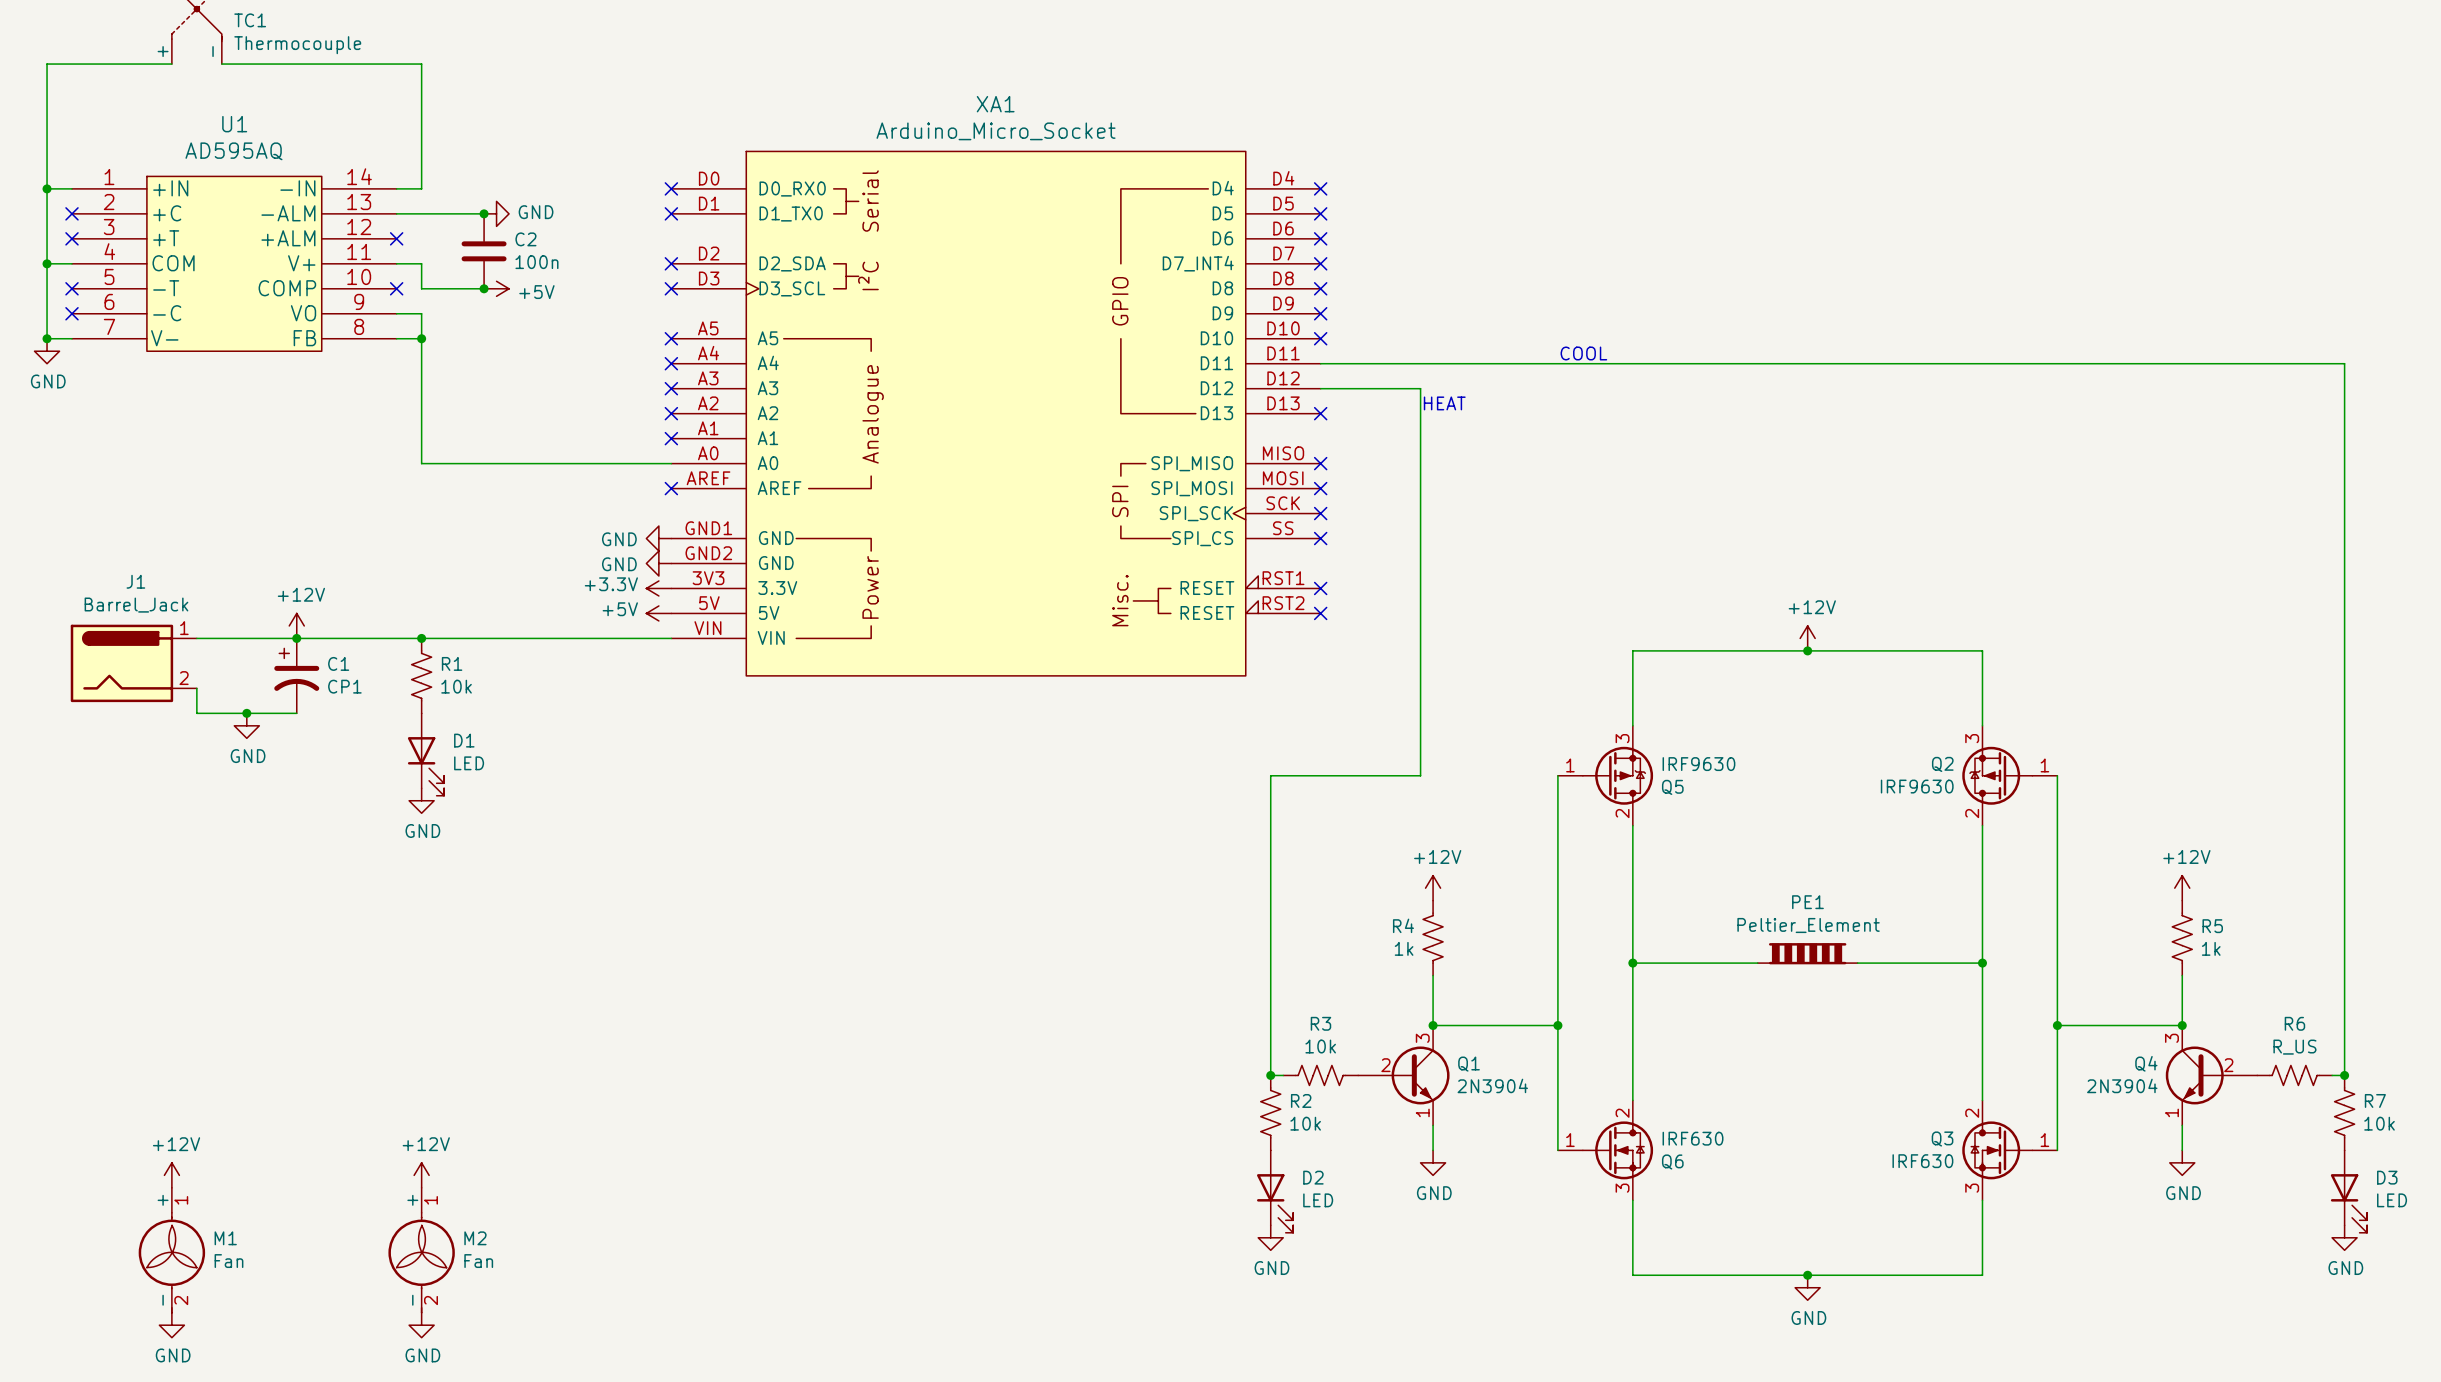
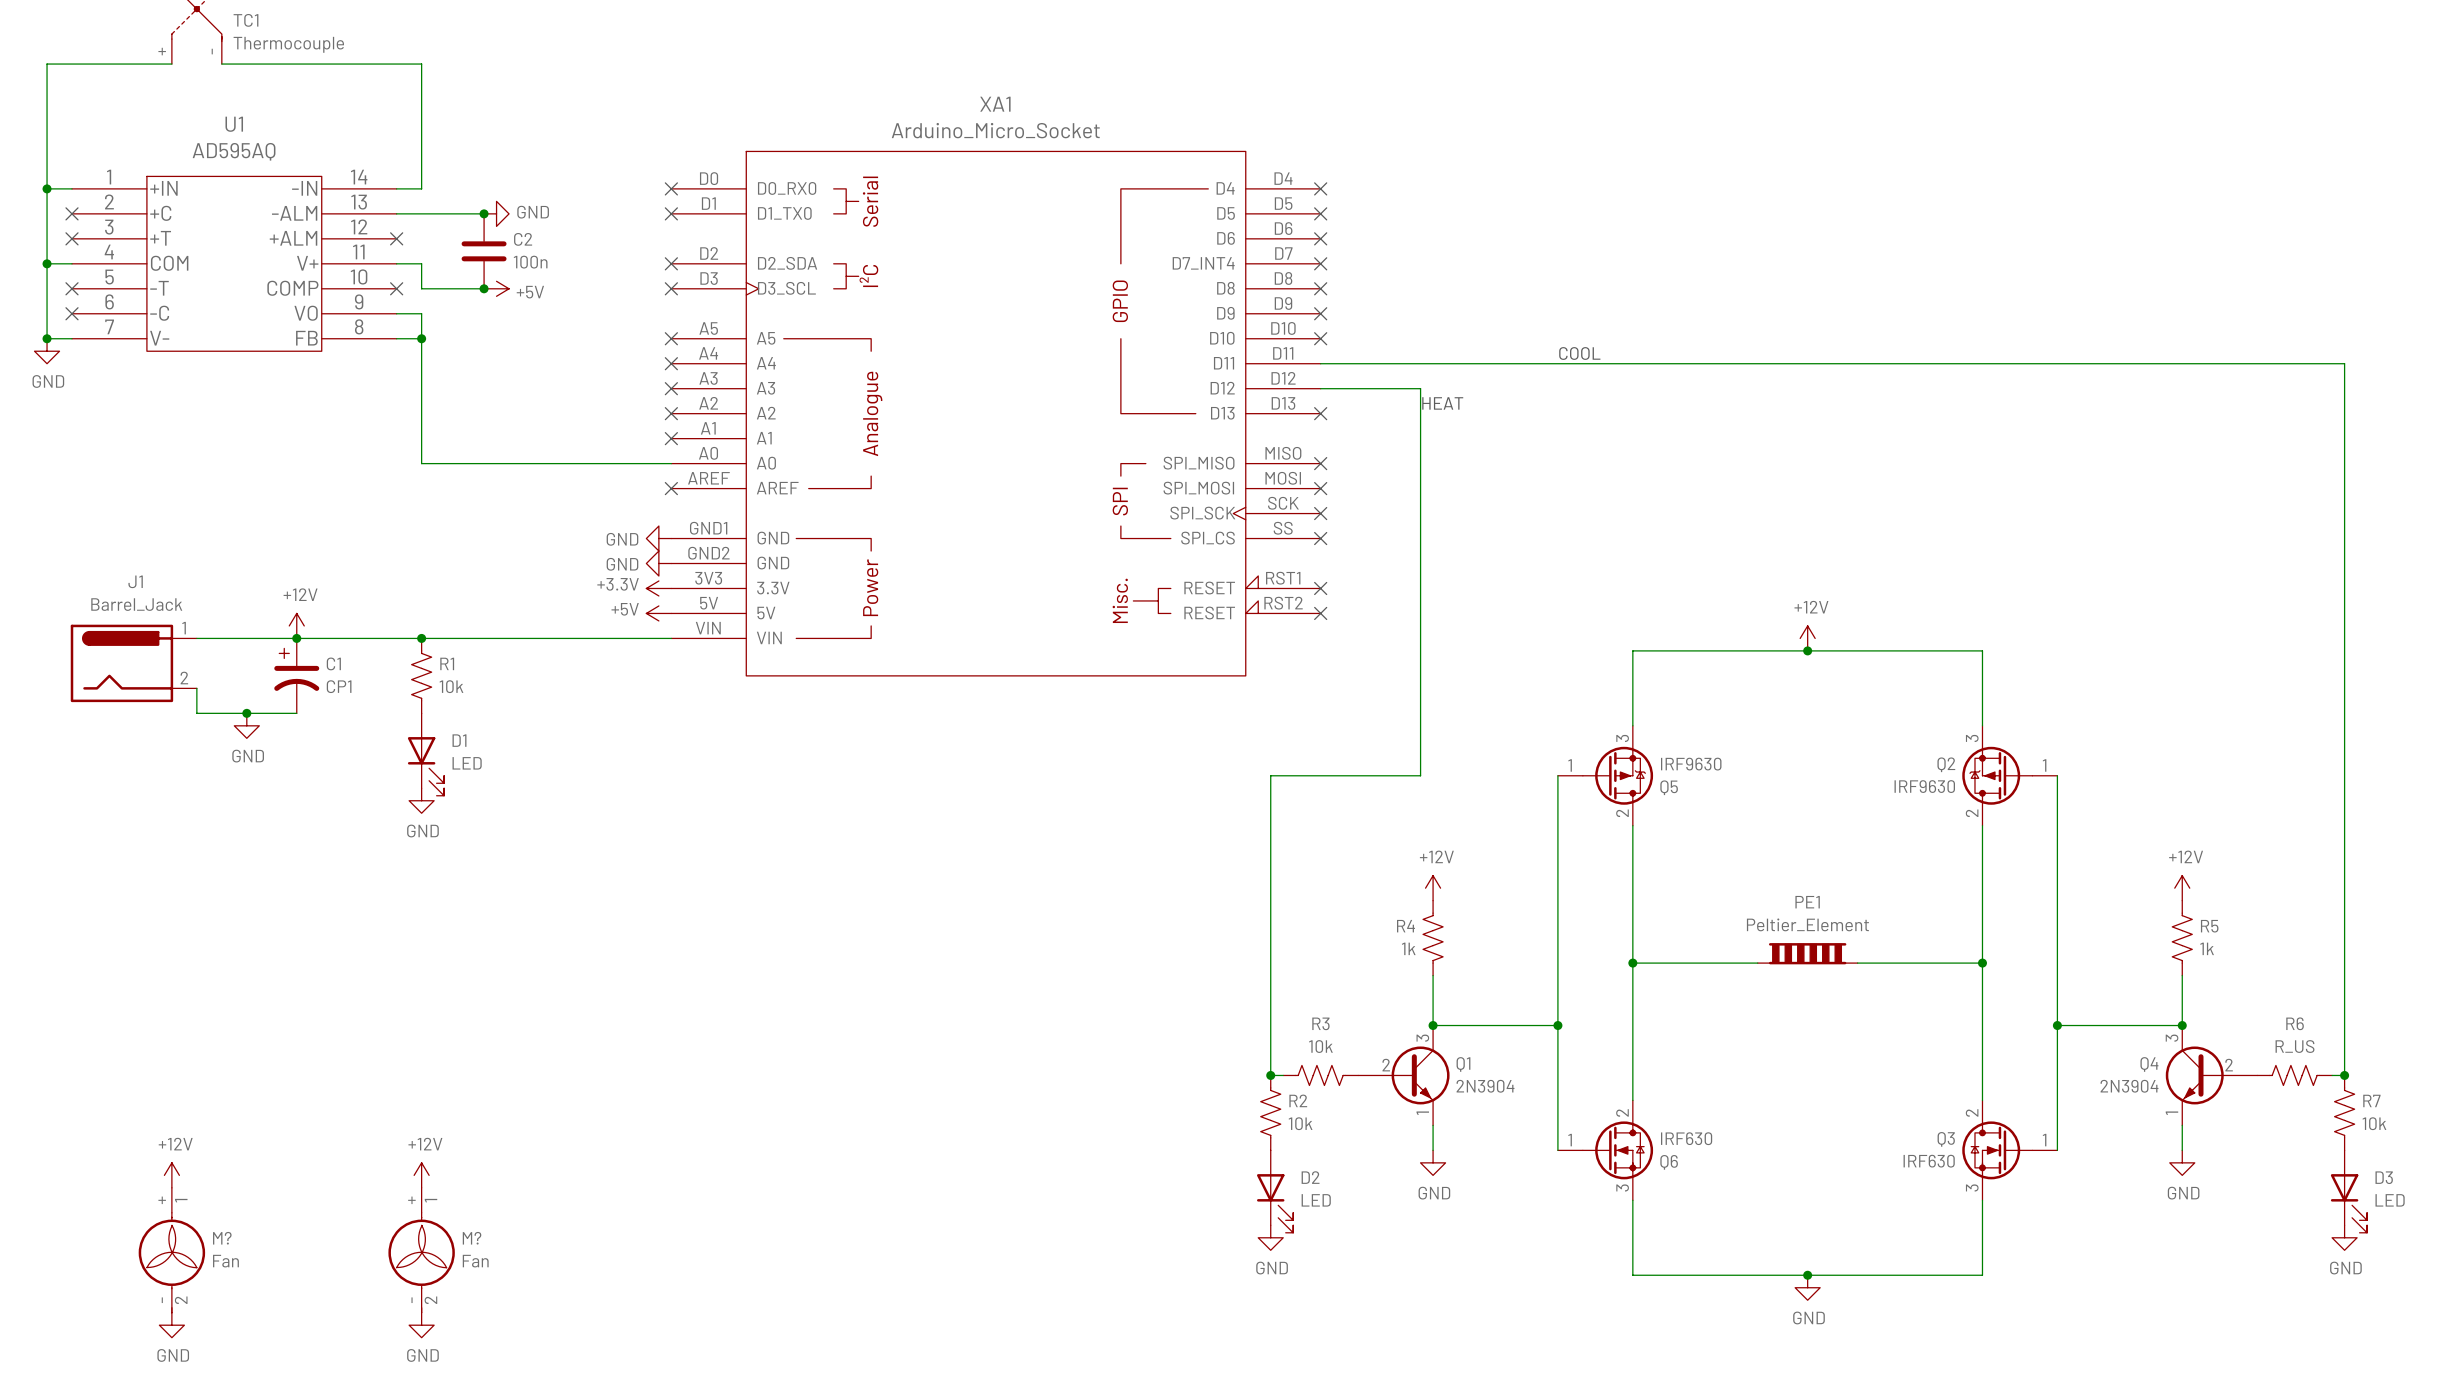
M1 name: M1 (225, 1238) -> M? (222, 1238)
M2 name: M2 (475, 1238) -> M? (472, 1238)

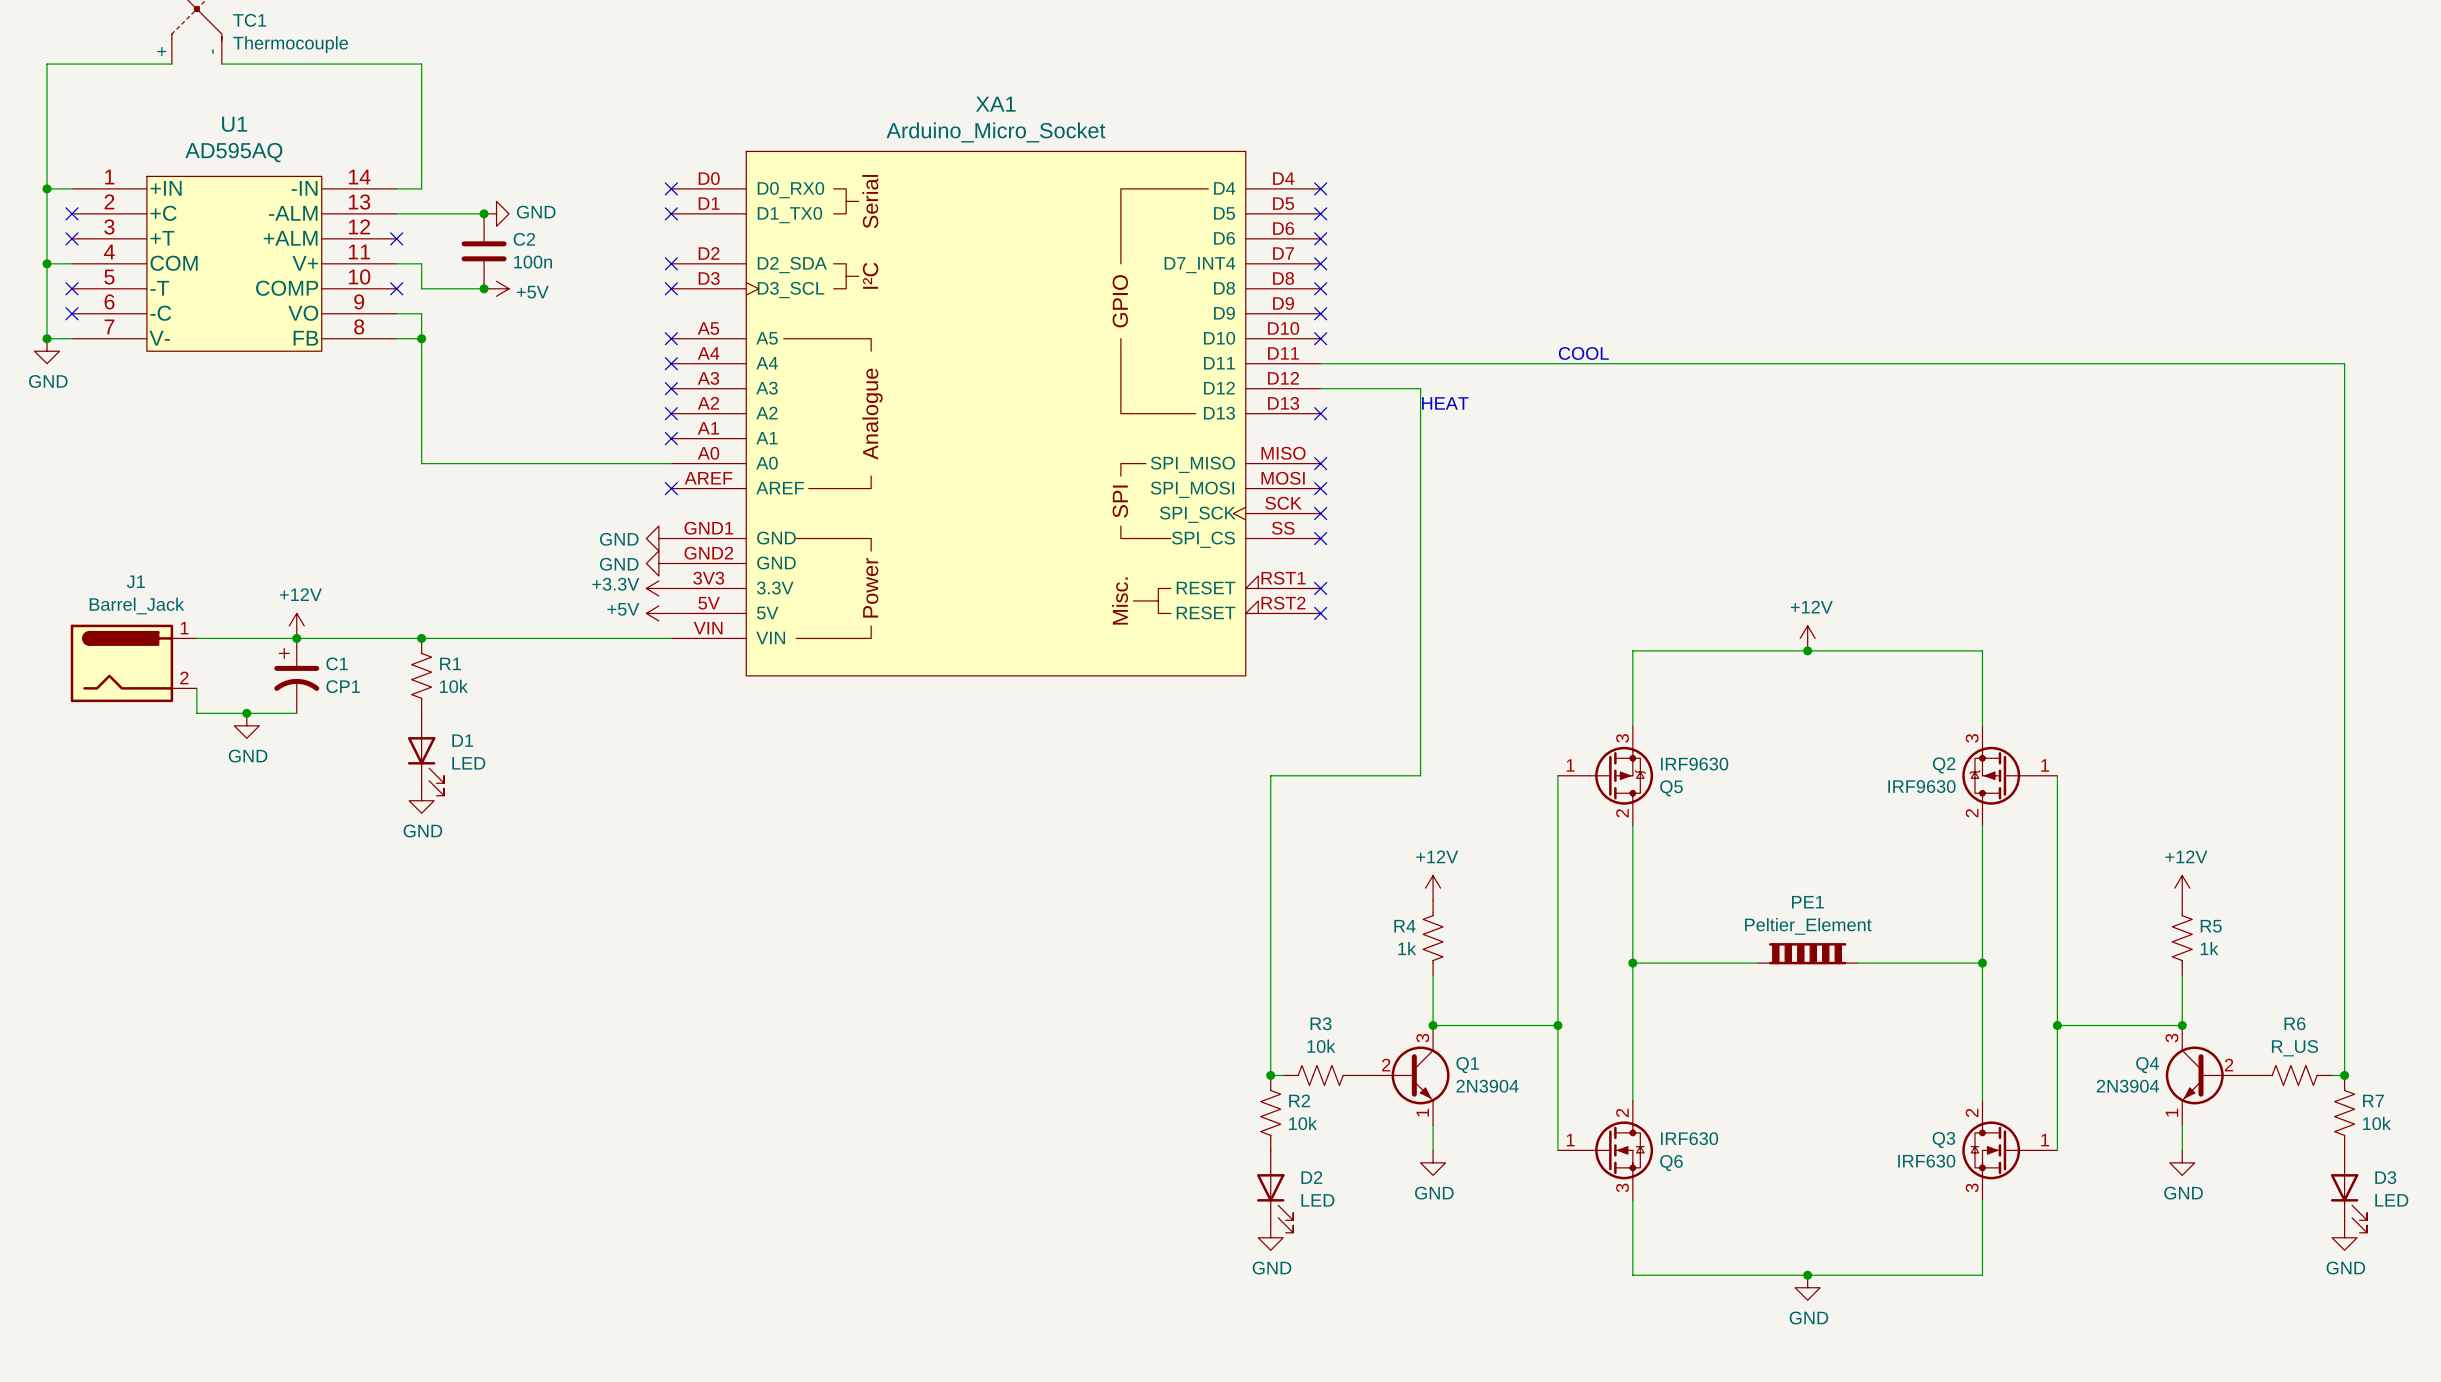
power symbol: +12V (171, 1175) -> none
power symbol: +12V (421, 1175) -> none
M?: Fan (171, 1250) -> none
M?: Fan (421, 1250) -> none
power symbol: GND (171, 1325) -> none
power symbol: GND (421, 1325) -> none

